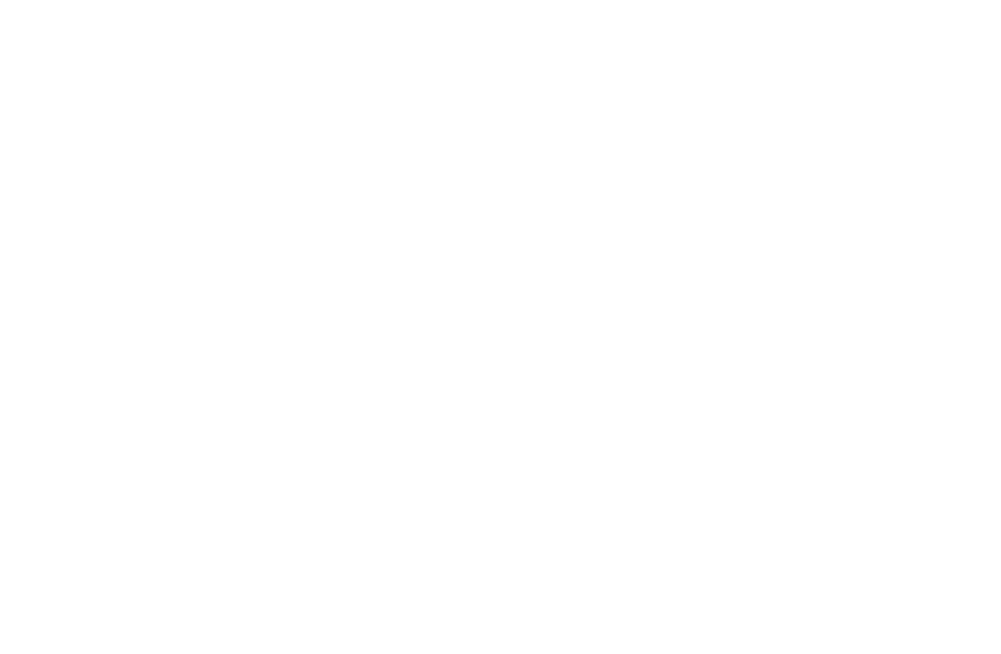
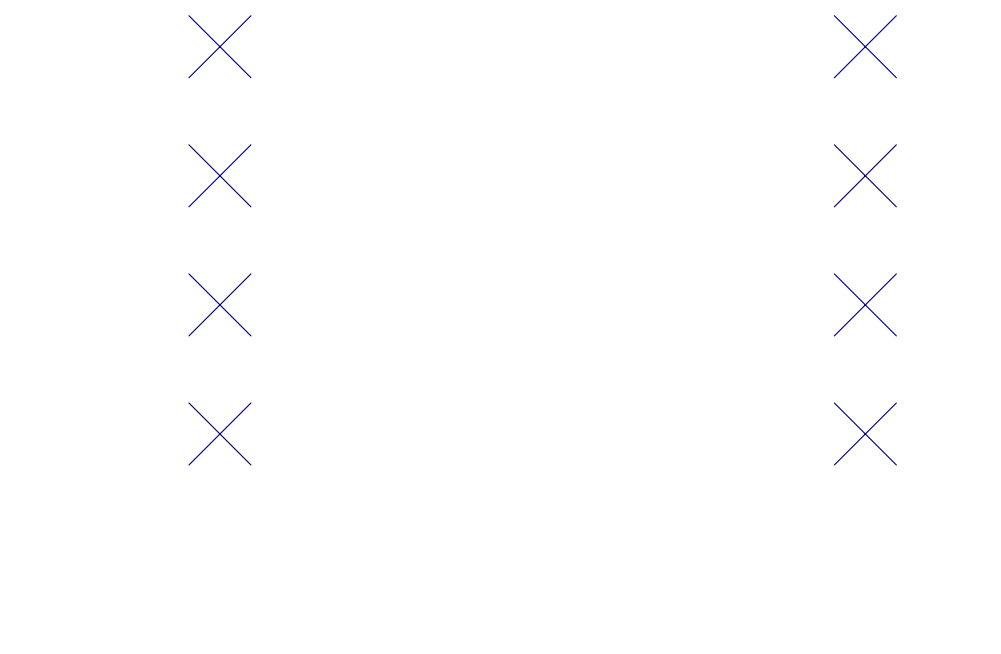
no-connect mark: none -> (219, 46)
no-connect mark: none -> (865, 46)
no-connect mark: none -> (219, 175)
no-connect mark: none -> (865, 175)
no-connect mark: none -> (219, 304)
no-connect mark: none -> (865, 304)
no-connect mark: none -> (219, 433)
no-connect mark: none -> (865, 433)

